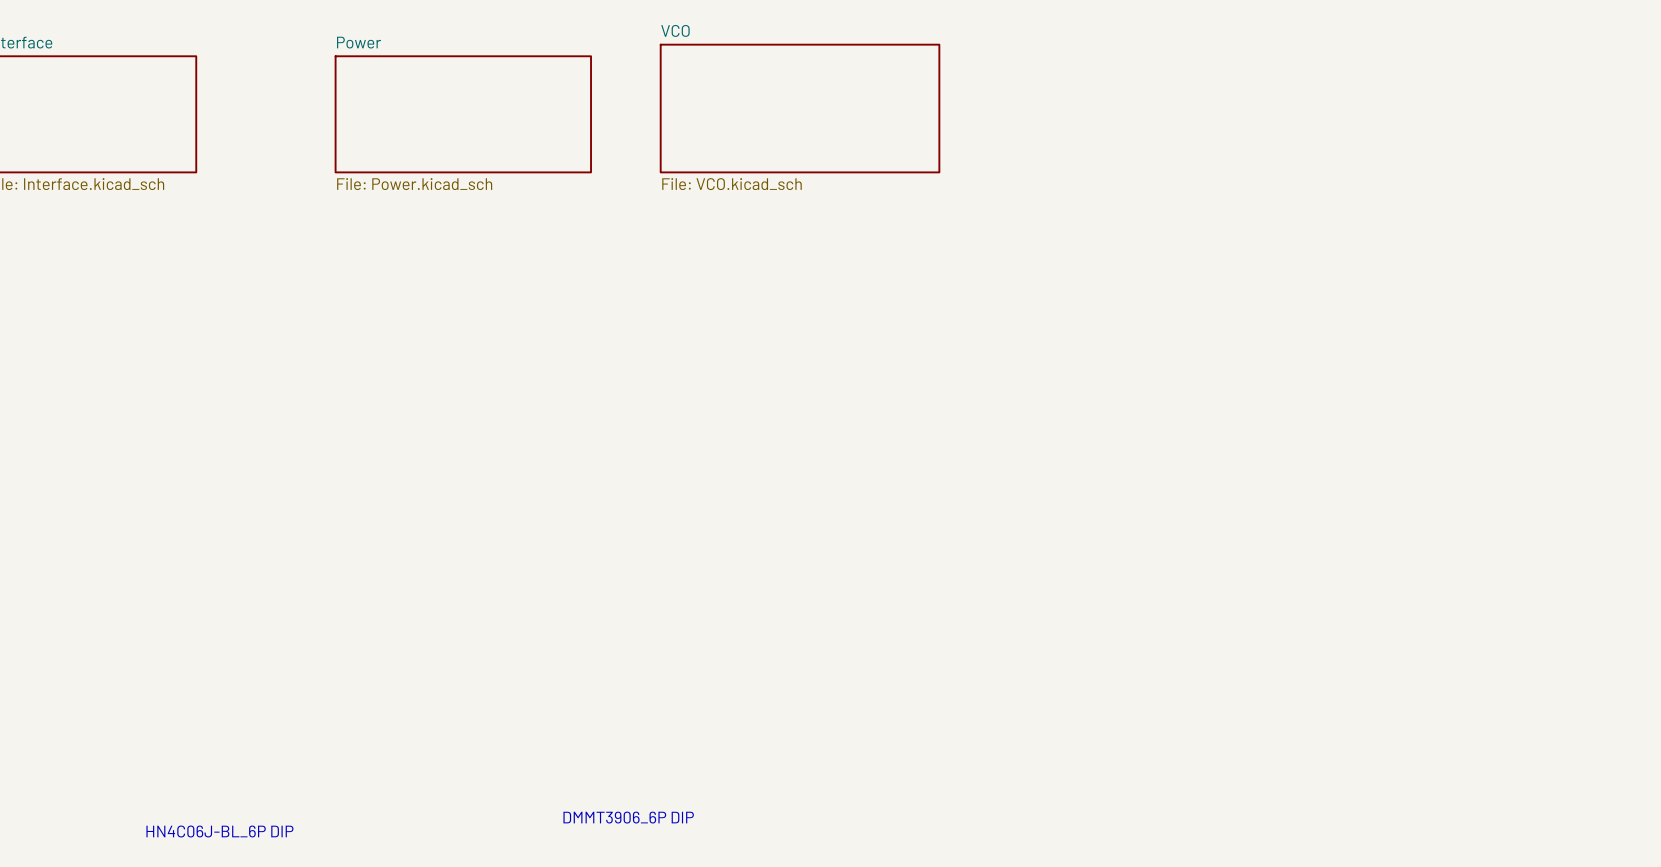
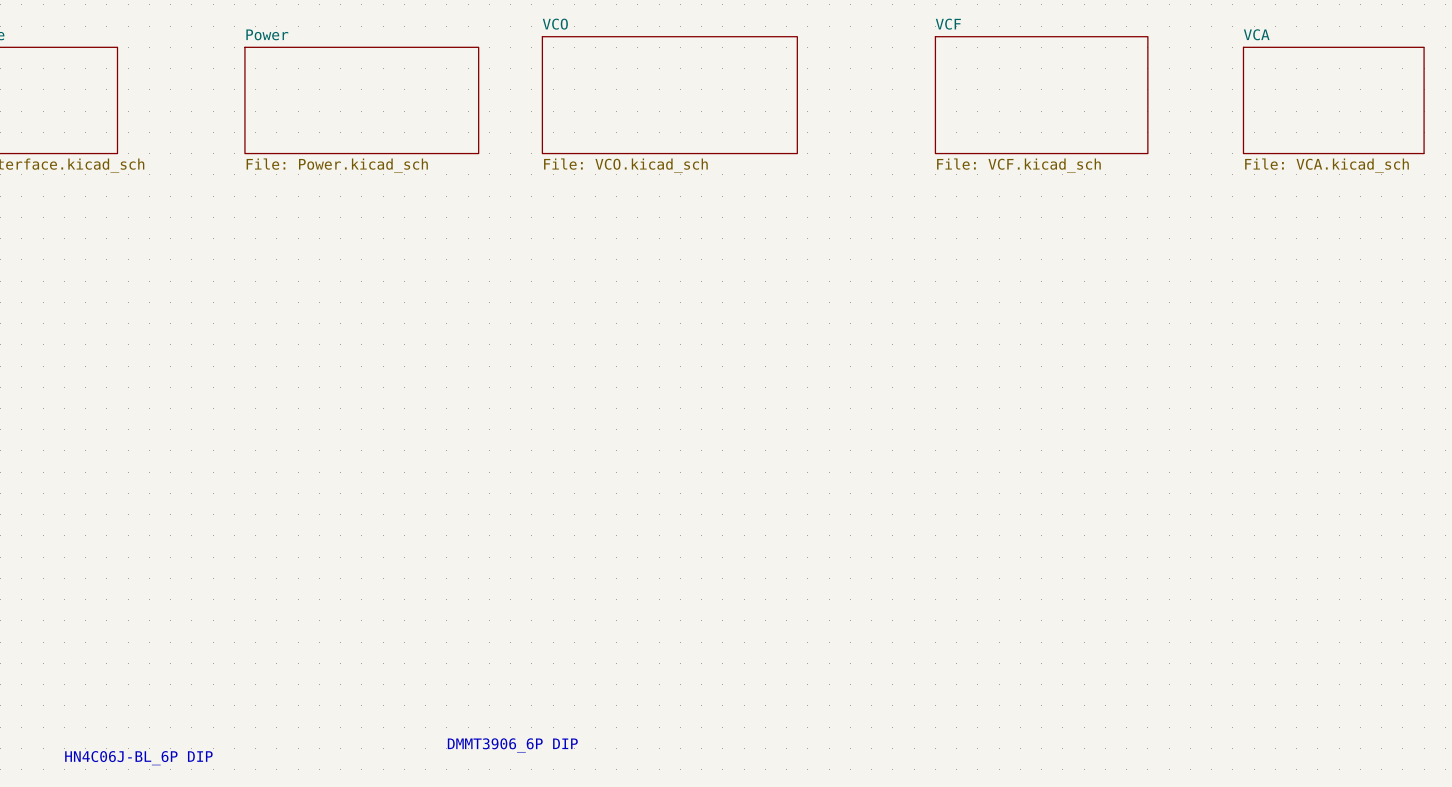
sheet VCF: none -> File: VCF.kicad_sch (1041, 95)
sheet VCA: none -> File: VCA.kicad_sch (1333, 100)

